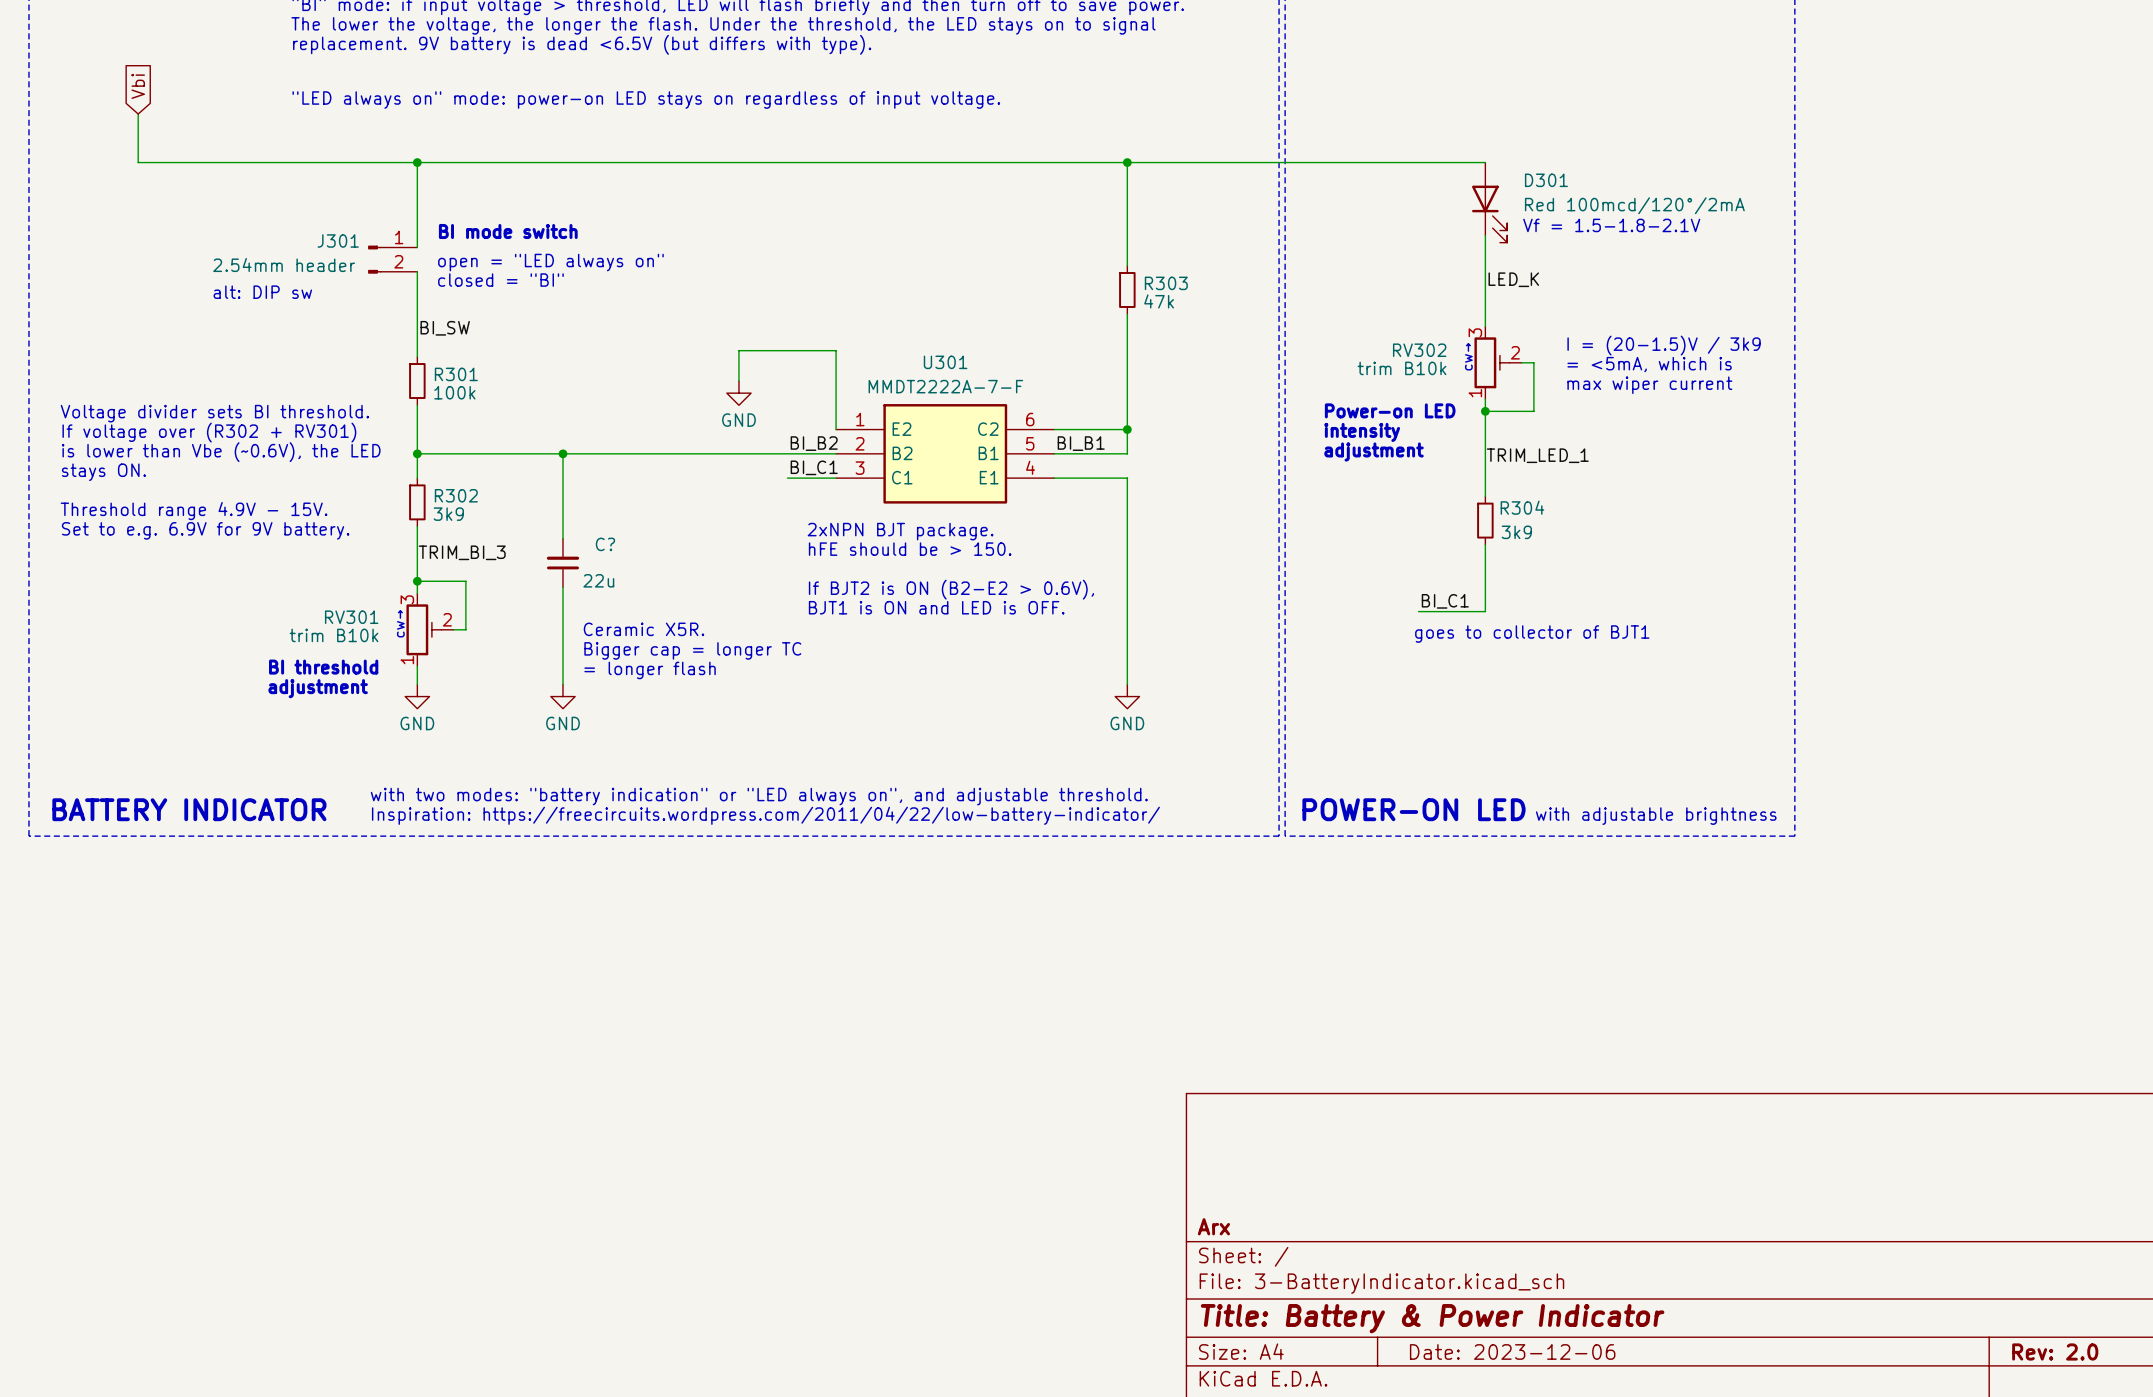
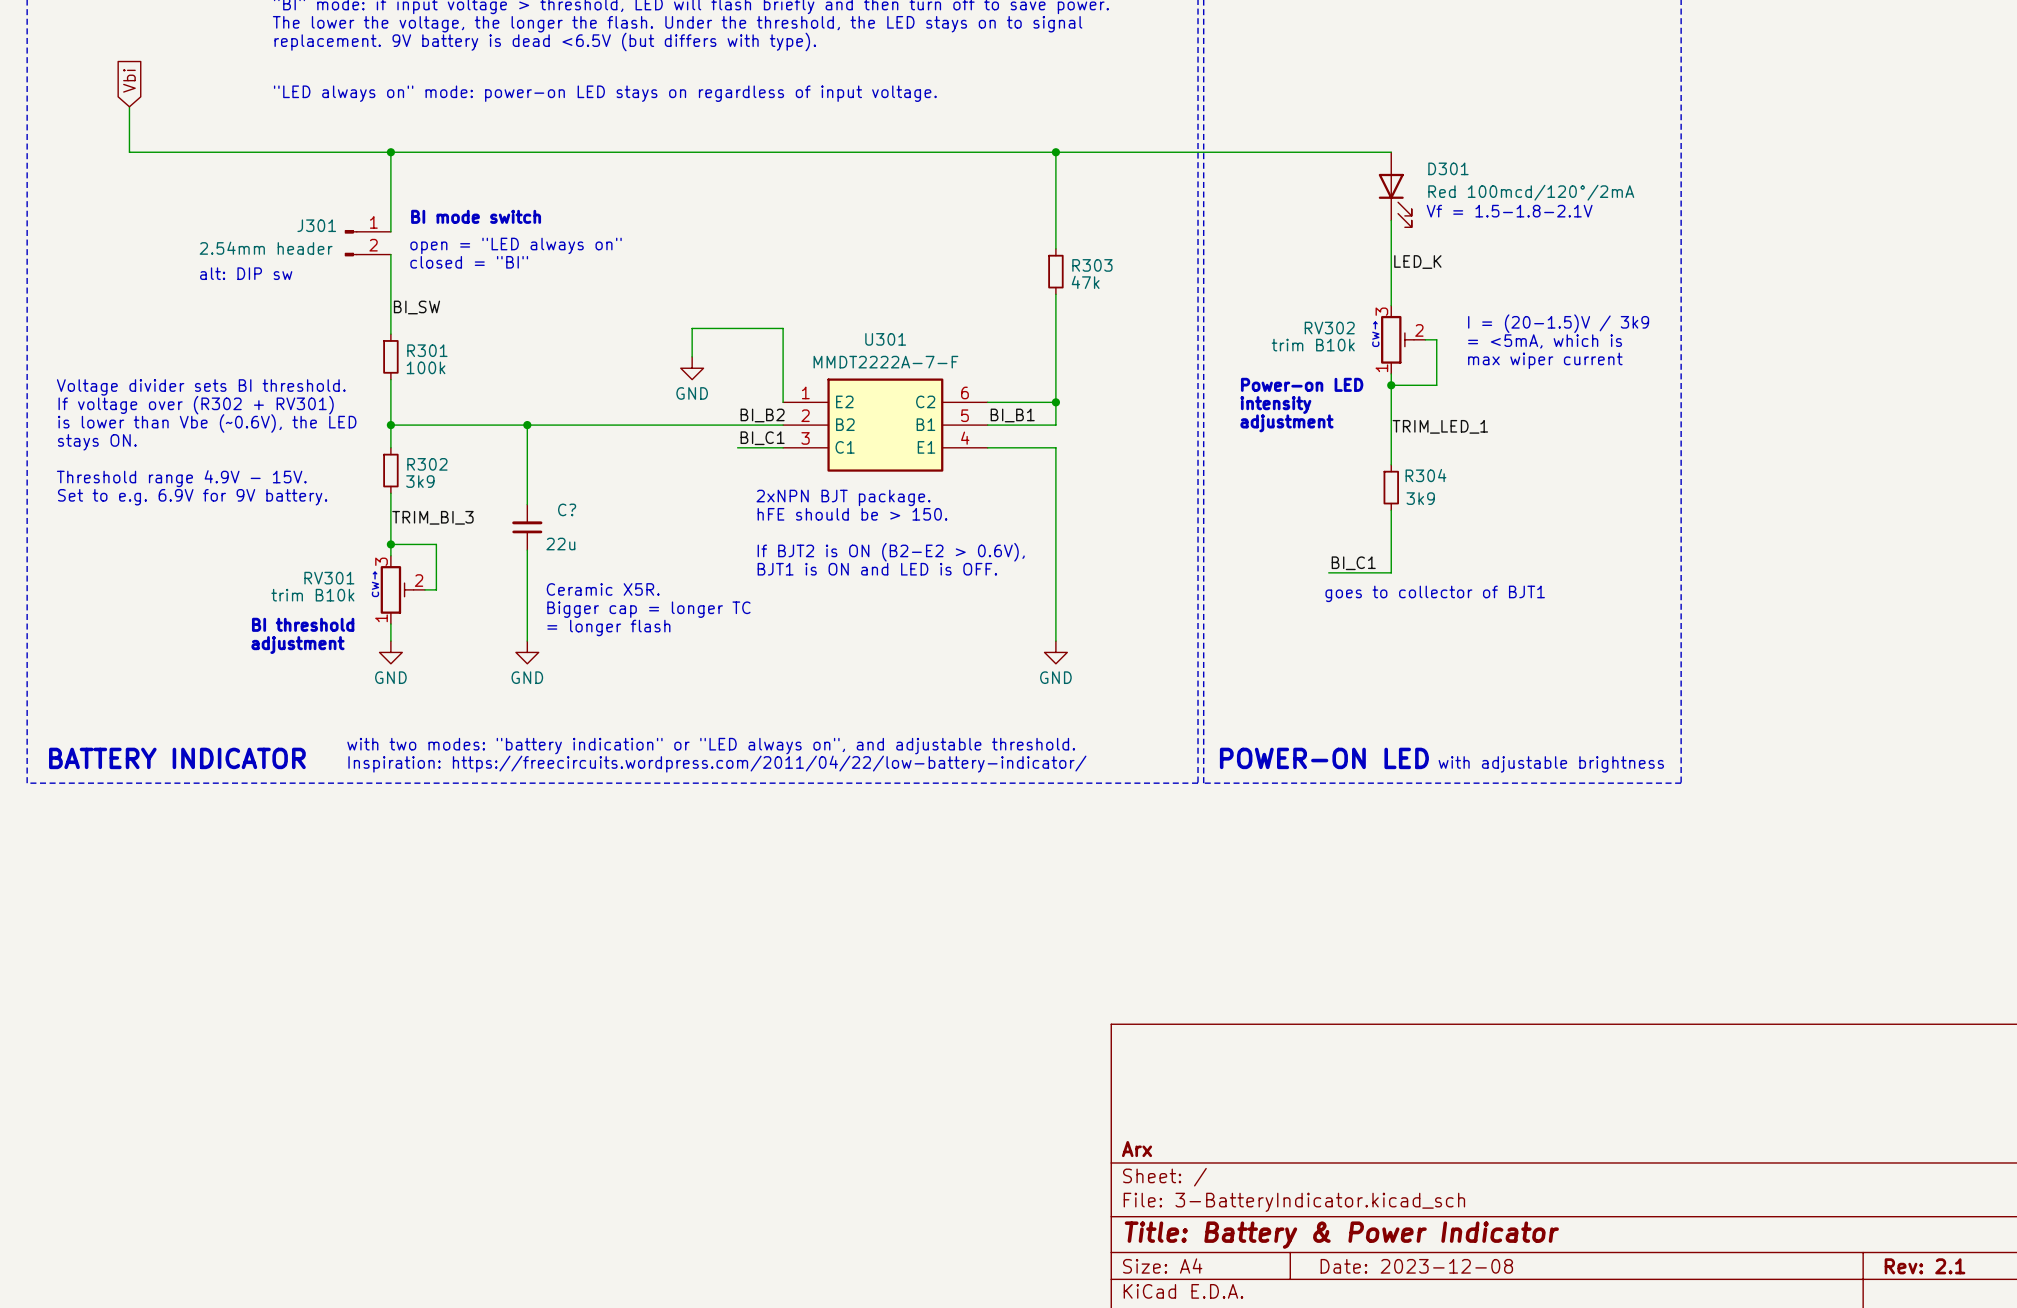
title block: Date: 2023-12-06 (1512, 1351) -> Date: 2023-12-08 (1416, 1266)
title block: Rev: 2.0 (2055, 1351) -> Rev: 2.1 (1925, 1266)

